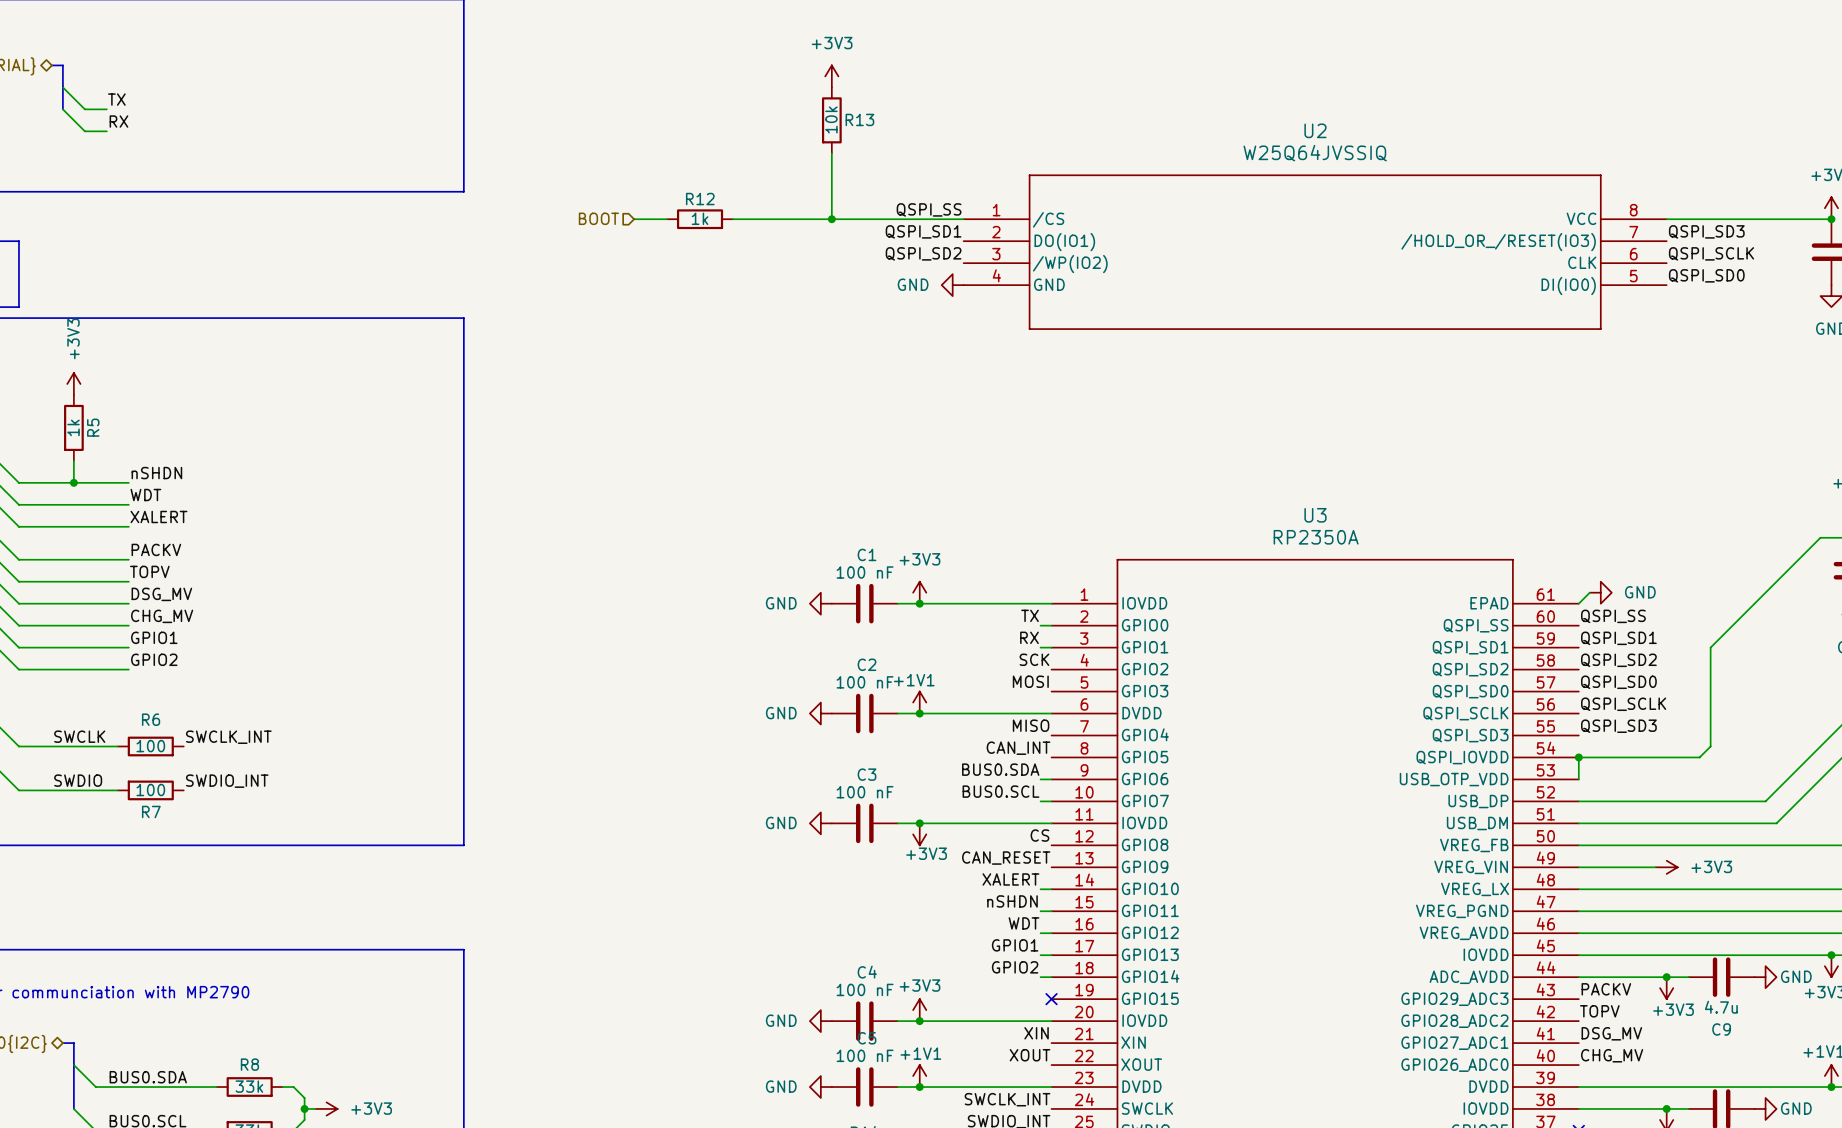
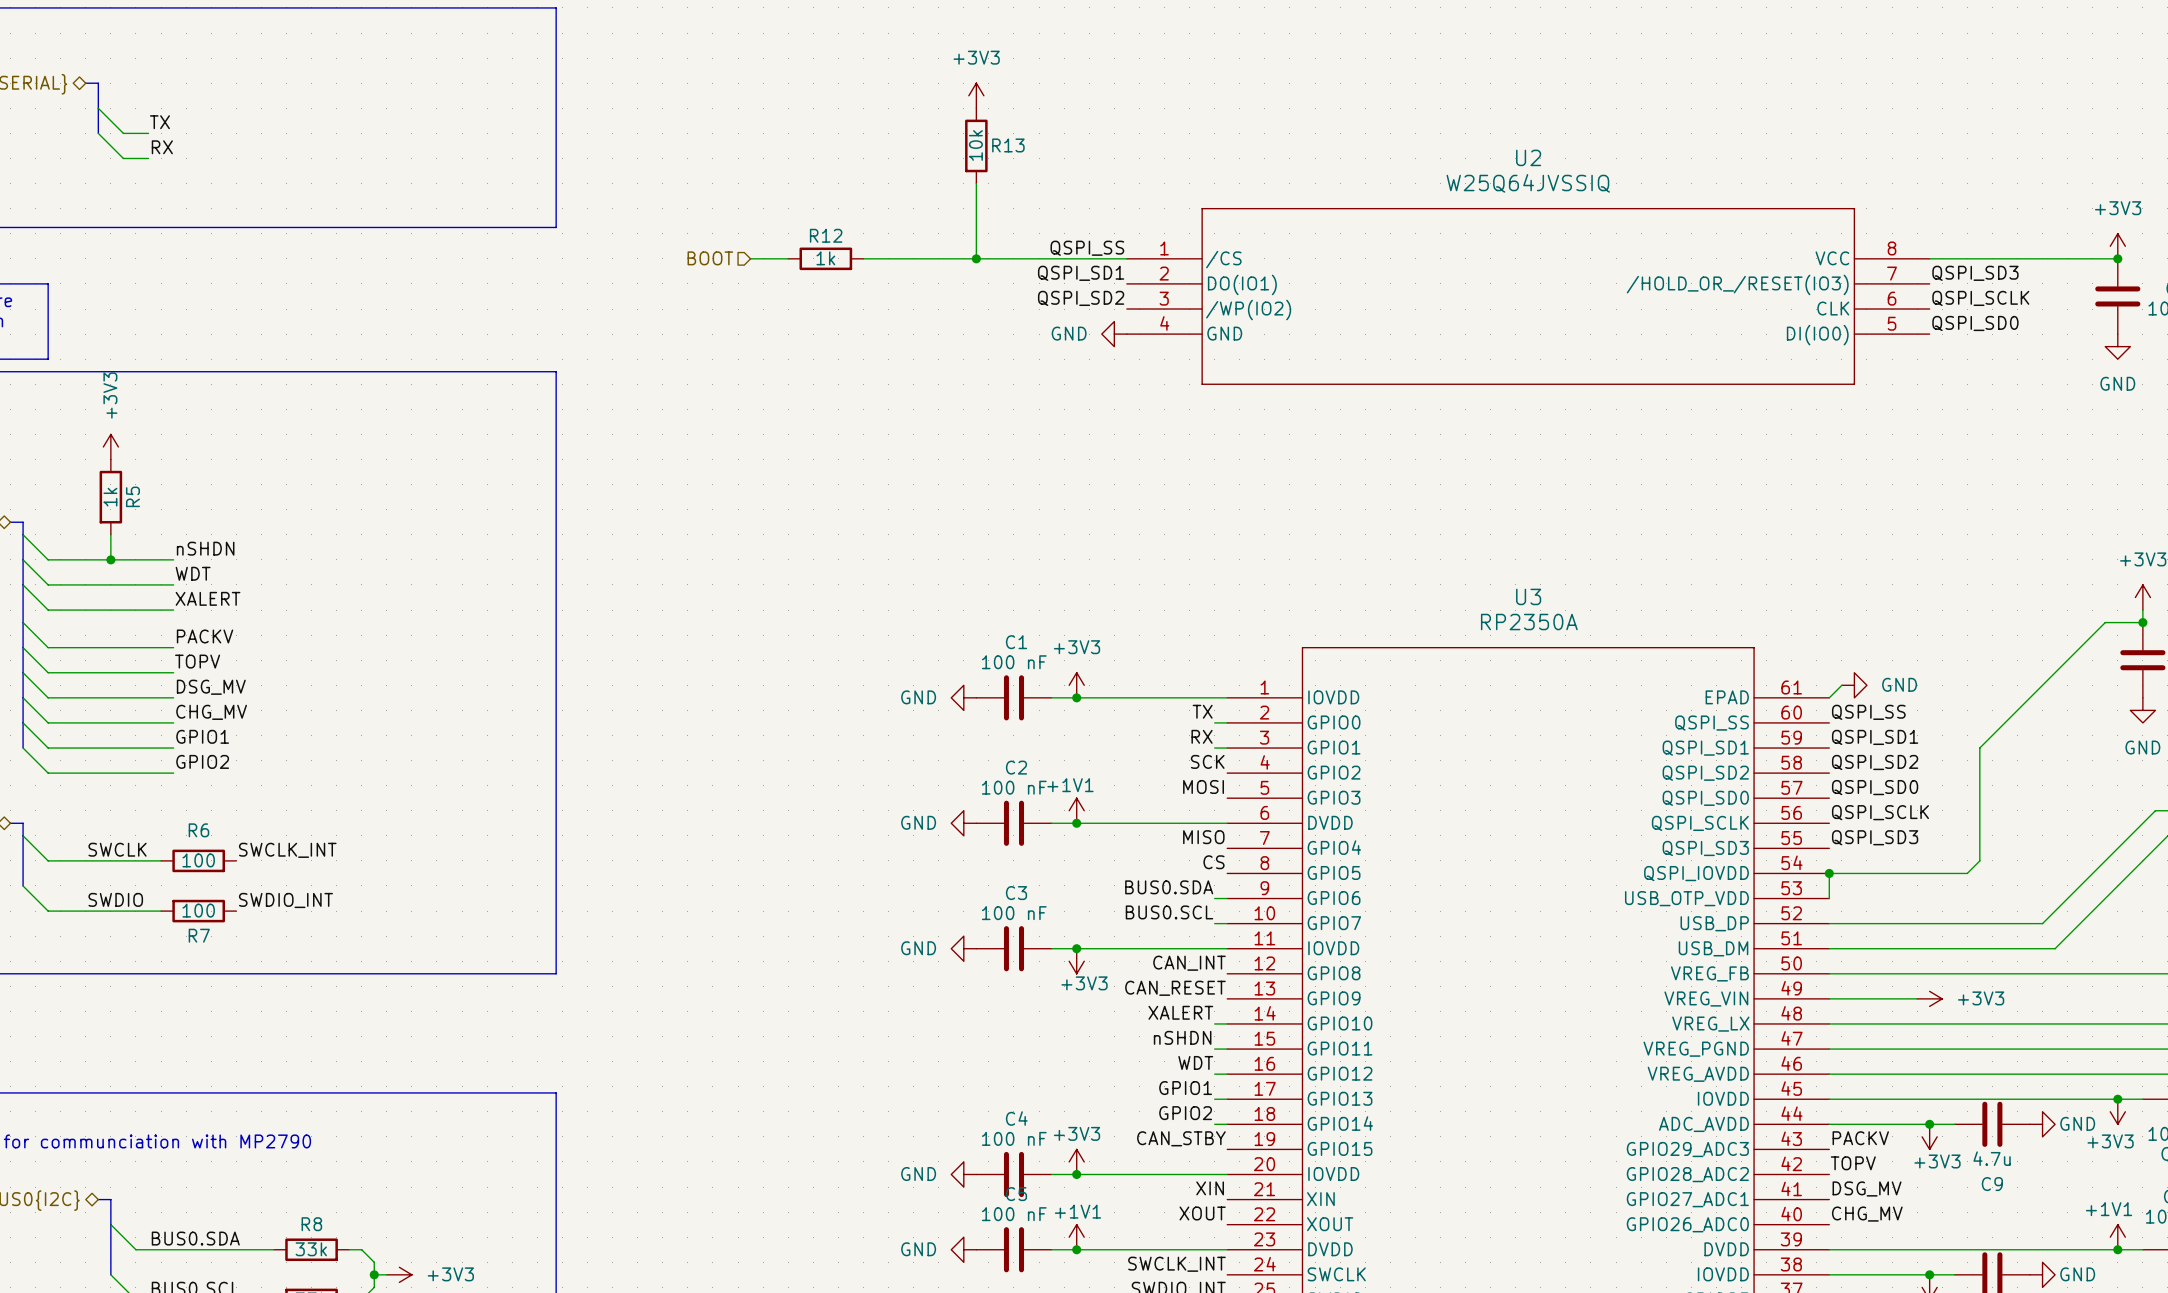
label: CAN_INT (1018, 748) -> CS (1213, 862)
label: CS (1039, 835) -> CAN_INT (1189, 963)
label: none -> CAN_STBY (1181, 1138)
no-connect mark: (1051, 999) -> none

